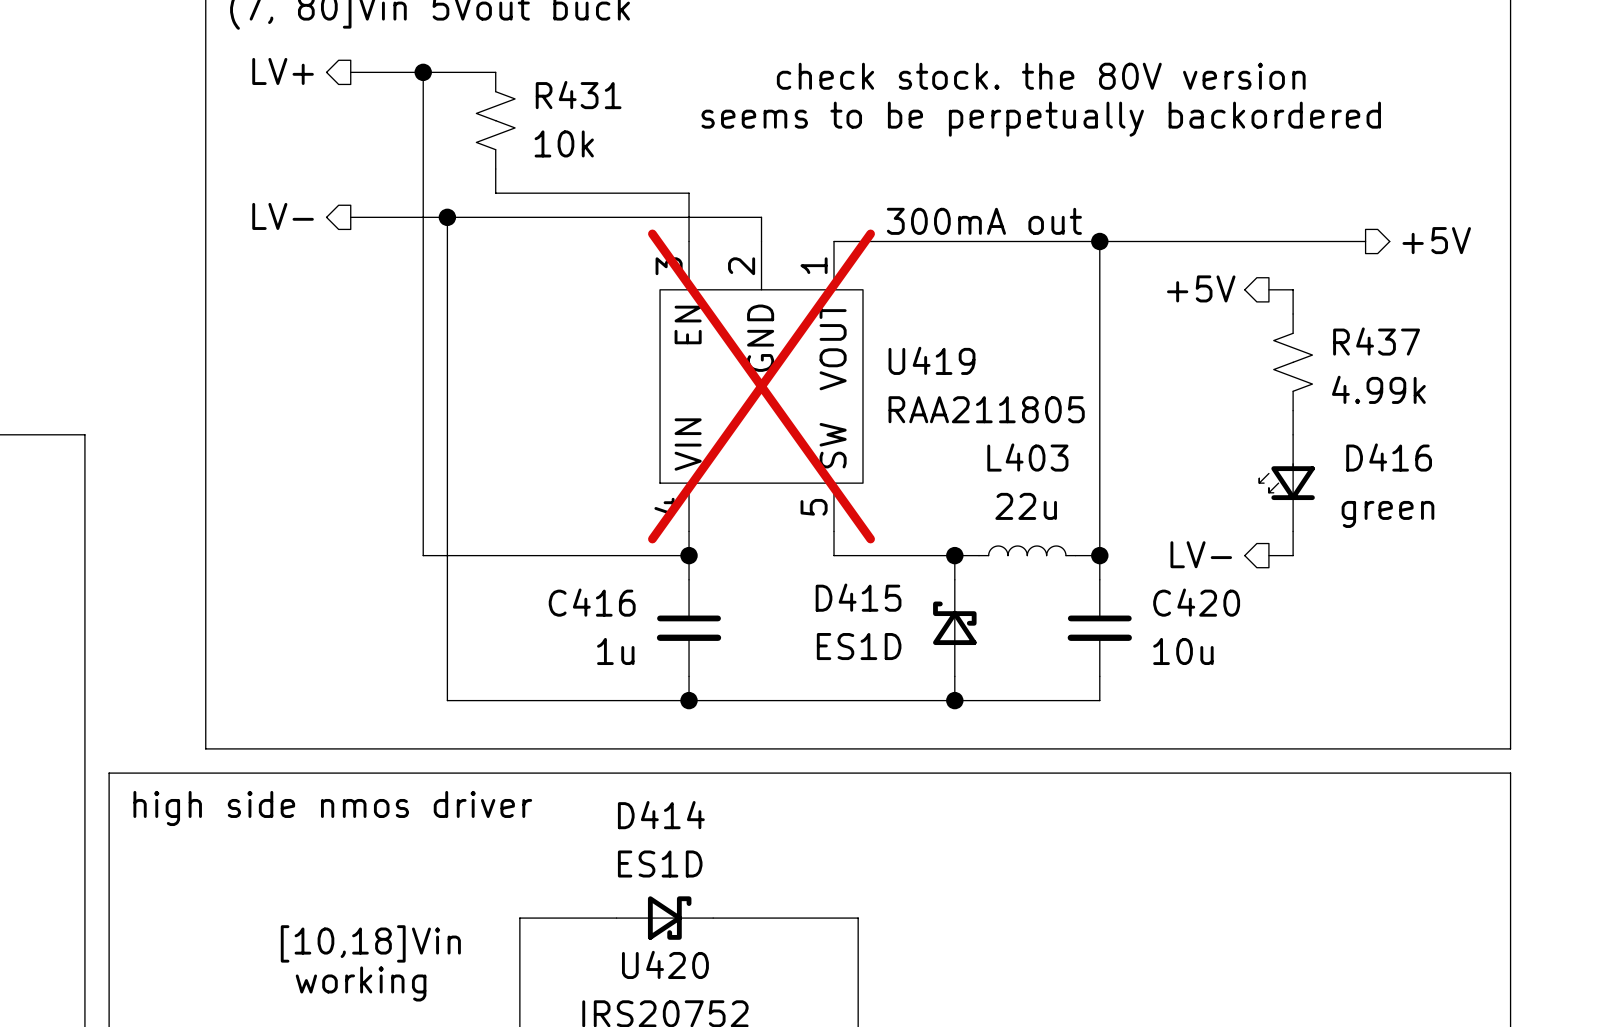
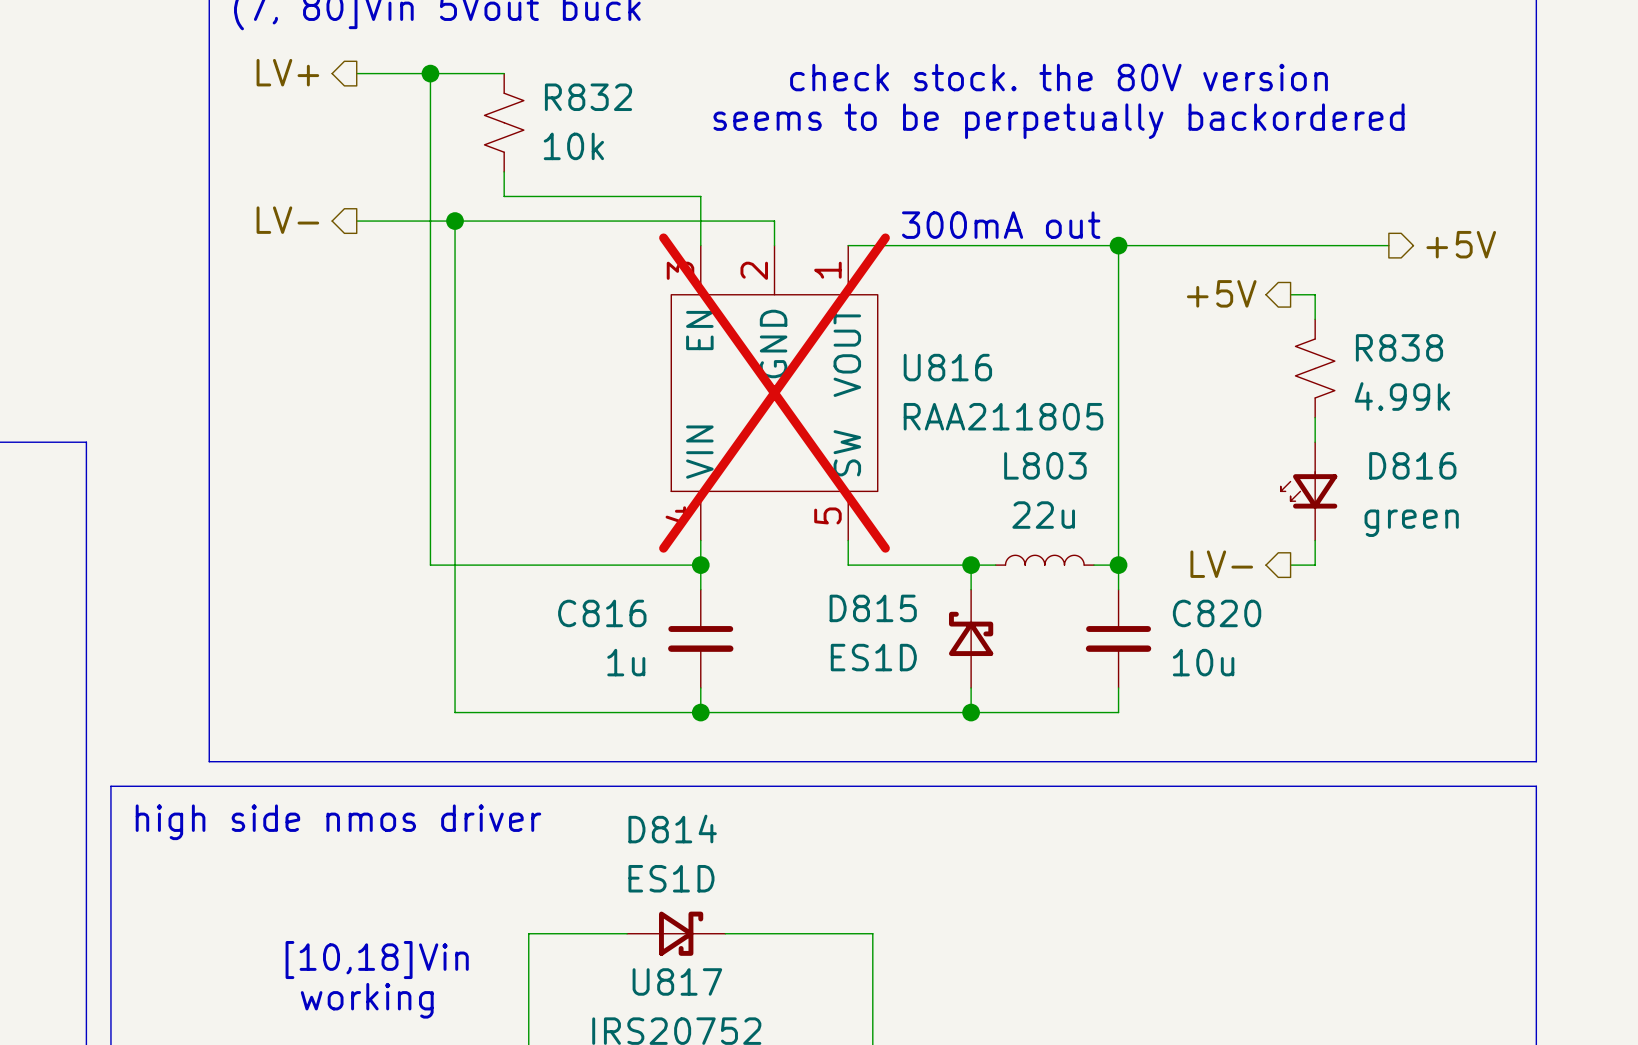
R431 name: R431 (578, 95) -> R832 (588, 97)
R437 name: R437 (1376, 341) -> R838 (1399, 347)
U419 name: U419 (931, 360) -> U816 (947, 367)
L403 name: L403 (1027, 457) -> L803 (1045, 465)
D416 name: D416 (1389, 457) -> D816 (1412, 465)
D415 name: D415 (858, 597) -> D815 (873, 608)
C416 name: C416 (592, 602) -> C816 (602, 613)
C420 name: C420 (1196, 602) -> C820 (1217, 613)
D414 name: D414 (661, 815) -> D814 (672, 829)
U420 name: U420 (665, 964) -> U817 (677, 981)

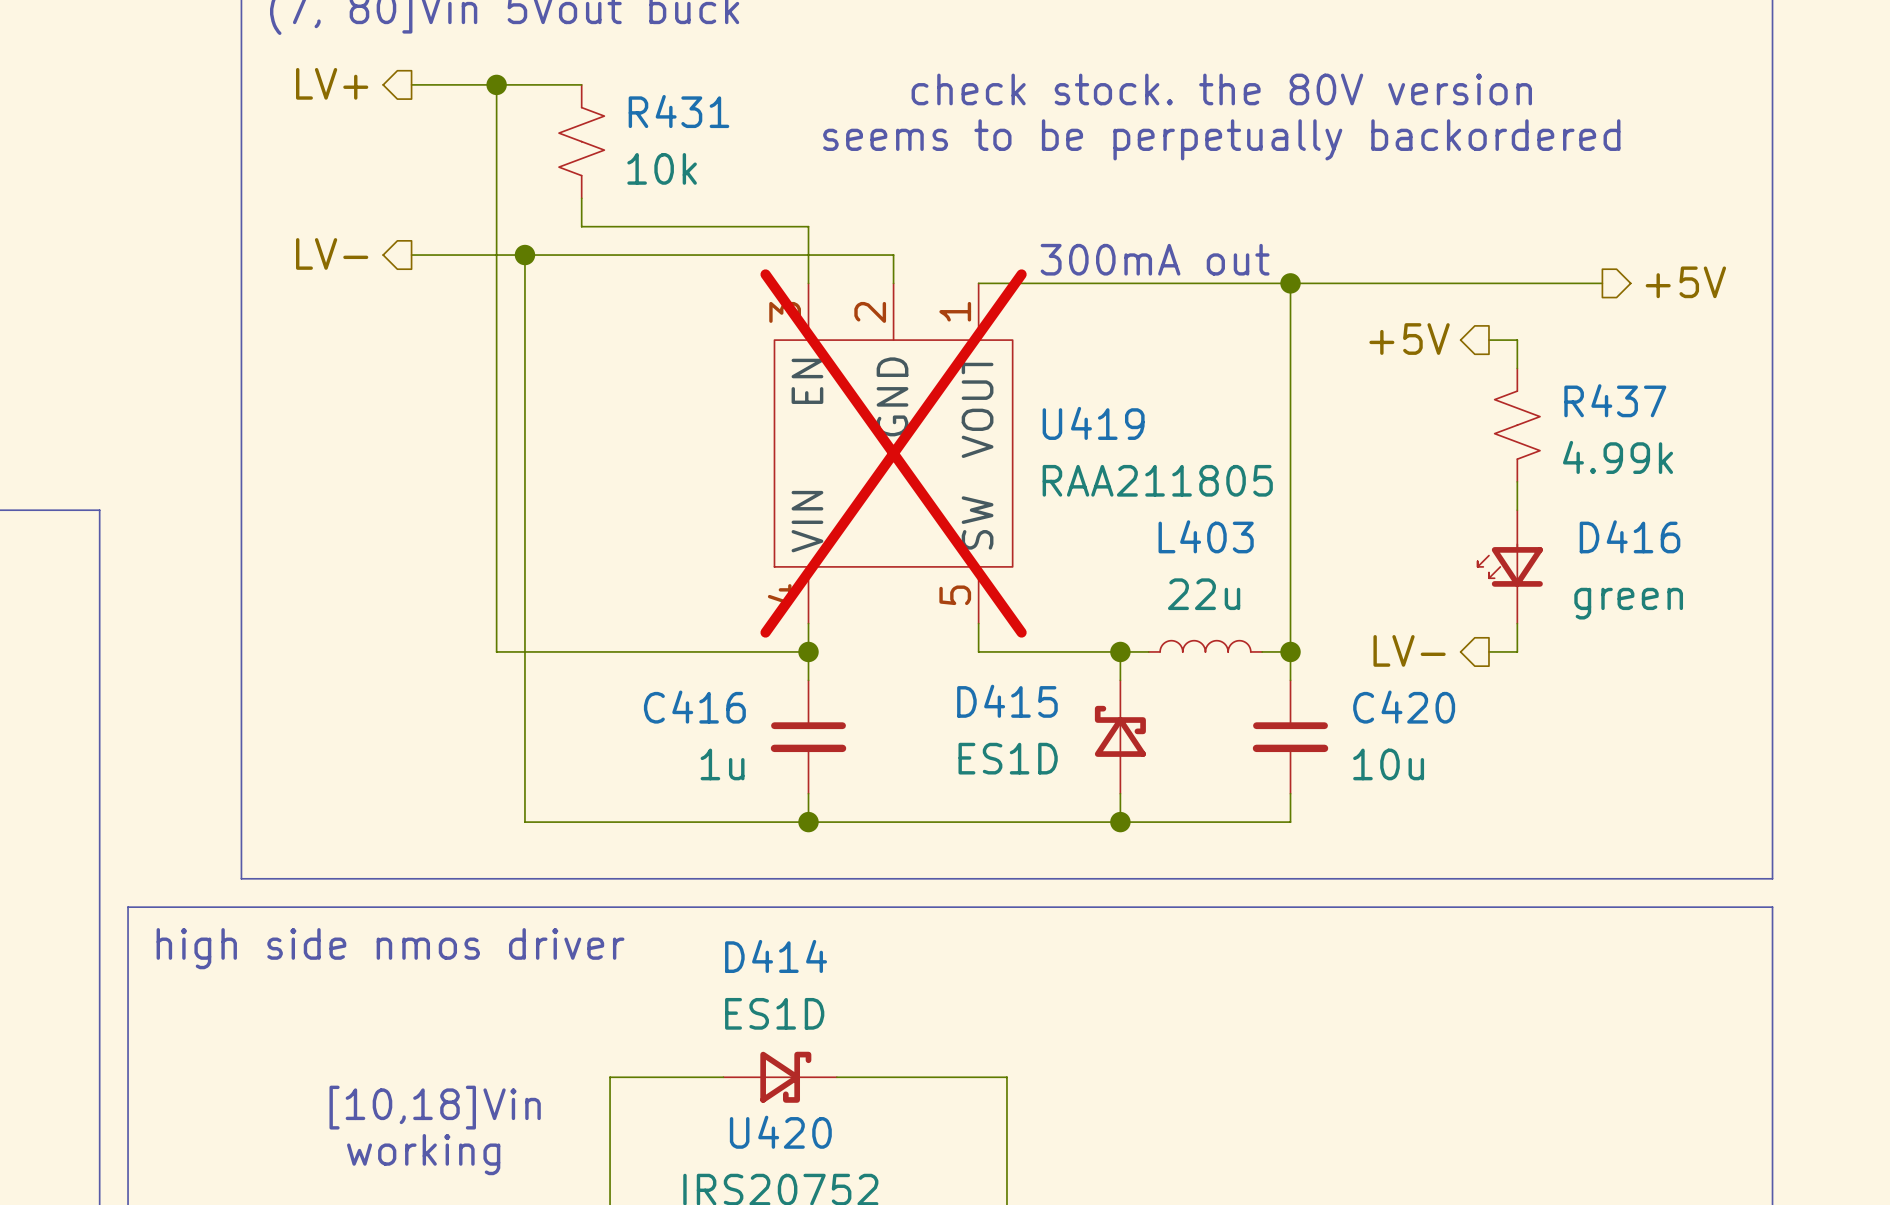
R832 name: R832 (588, 97) -> R431 (678, 111)
R838 name: R838 (1399, 347) -> R437 (1615, 400)
U816 name: U816 (947, 367) -> U419 (1093, 423)
L803 name: L803 (1045, 465) -> L403 (1206, 536)
D816 name: D816 (1412, 465) -> D416 (1630, 536)
D815 name: D815 (873, 608) -> D415 (1007, 701)
C816 name: C816 (602, 613) -> C416 (694, 707)
C820 name: C820 (1217, 613) -> C420 (1404, 707)
D814 name: D814 (672, 829) -> D414 (776, 956)
U817 name: U817 (677, 981) -> U420 (780, 1132)

